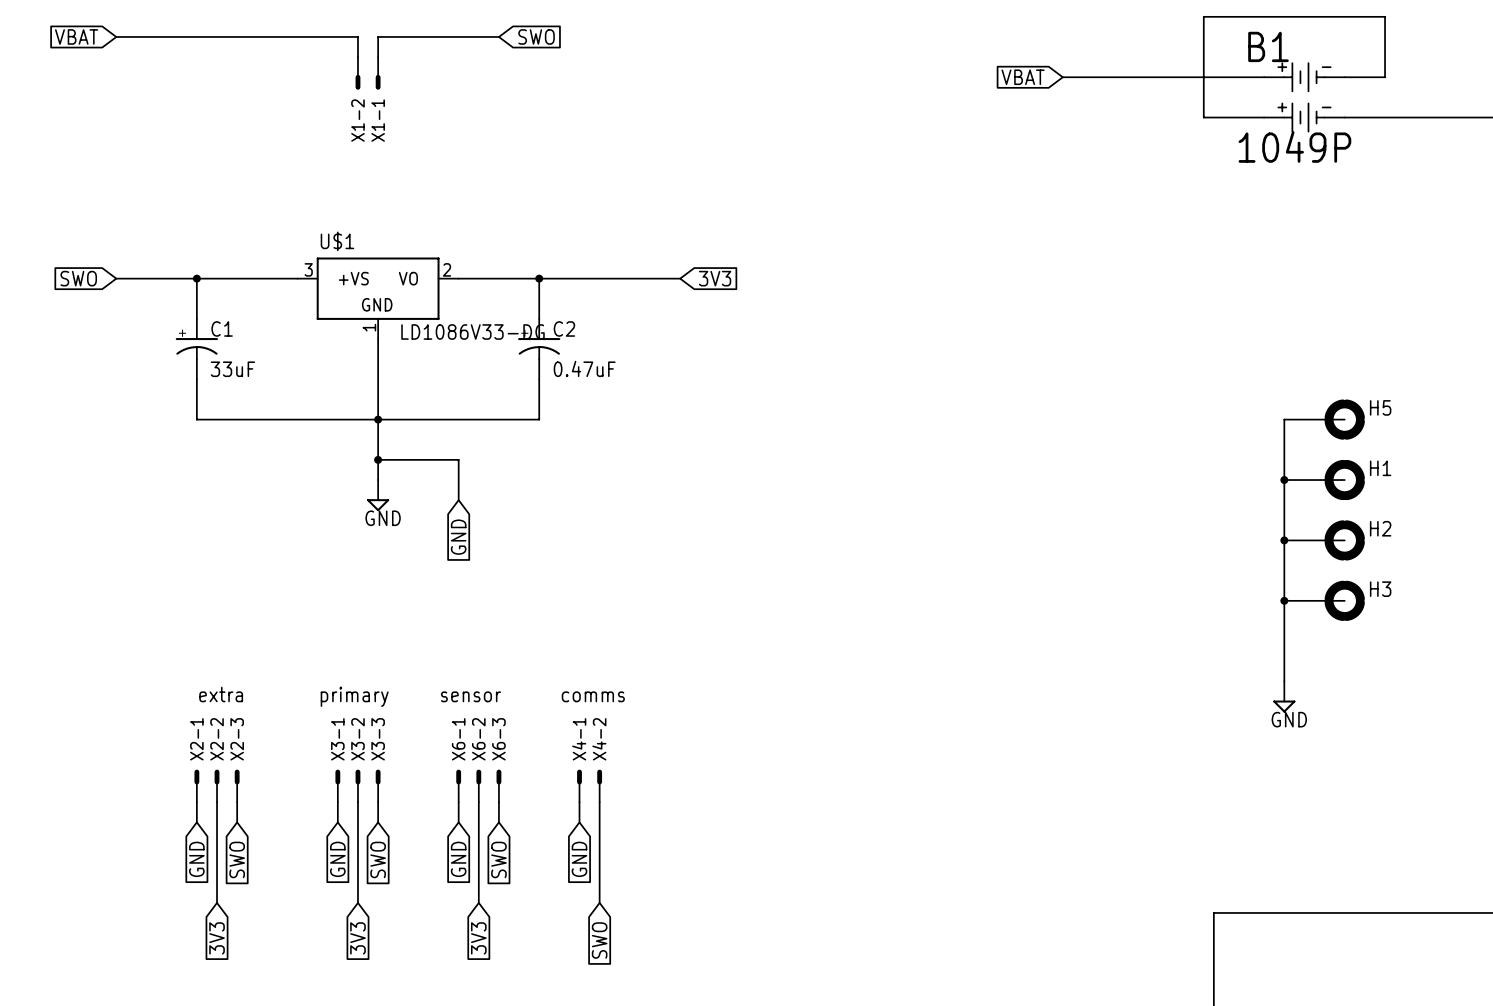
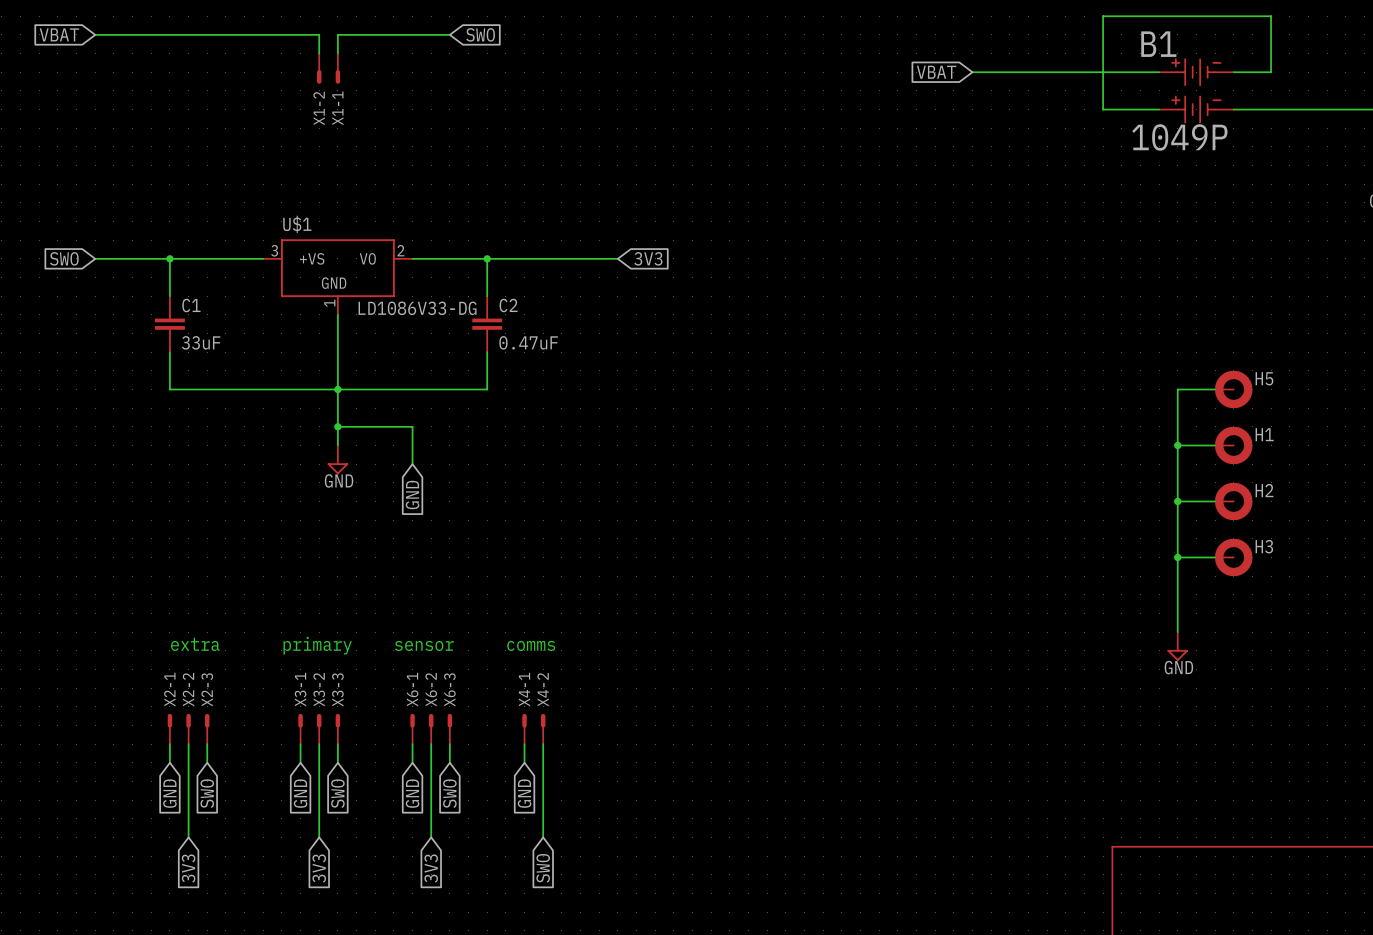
C1 symbol: [175, 318, 219, 380] -> [154, 296, 185, 353]
C2 symbol: [518, 318, 561, 380] -> [472, 296, 503, 353]

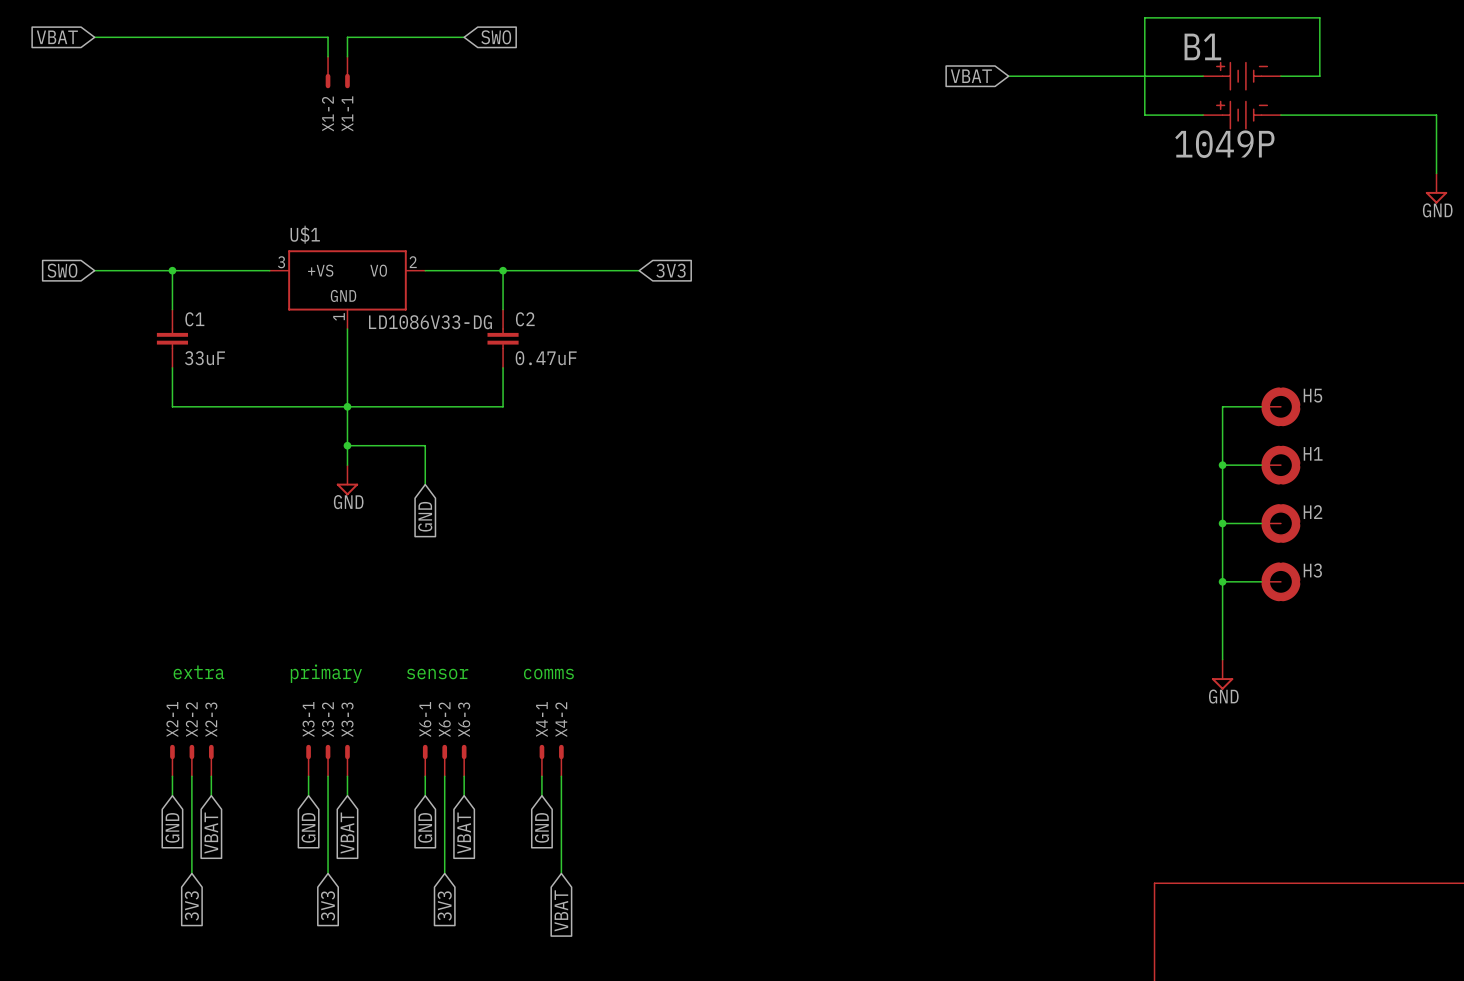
global label: SWO (207, 793) -> VBAT (211, 833)
global label: SWO (337, 793) -> VBAT (347, 833)
global label: SWO (449, 793) -> VBAT (464, 833)
global label: SWO (543, 868) -> VBAT (561, 910)

